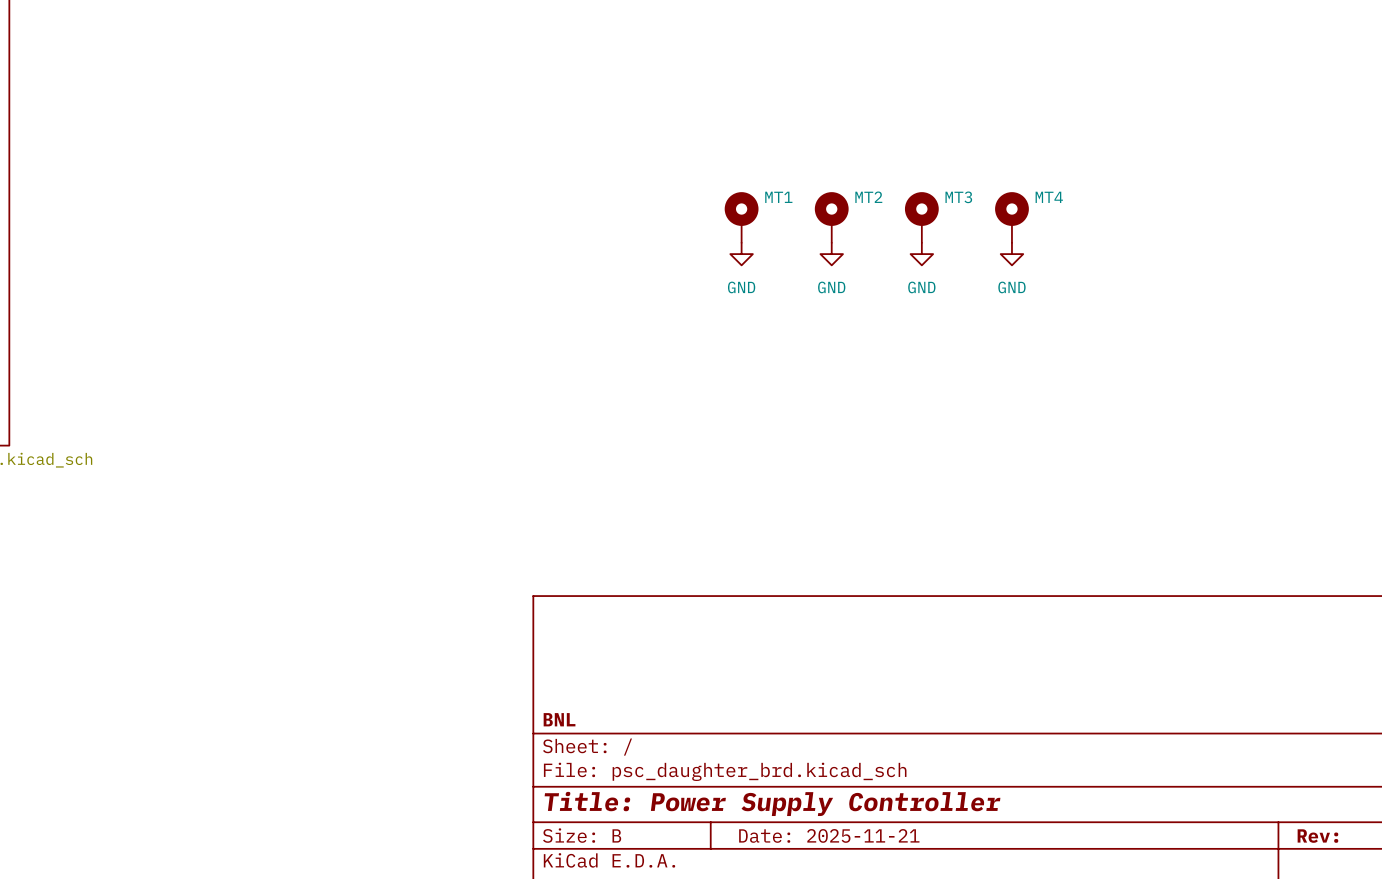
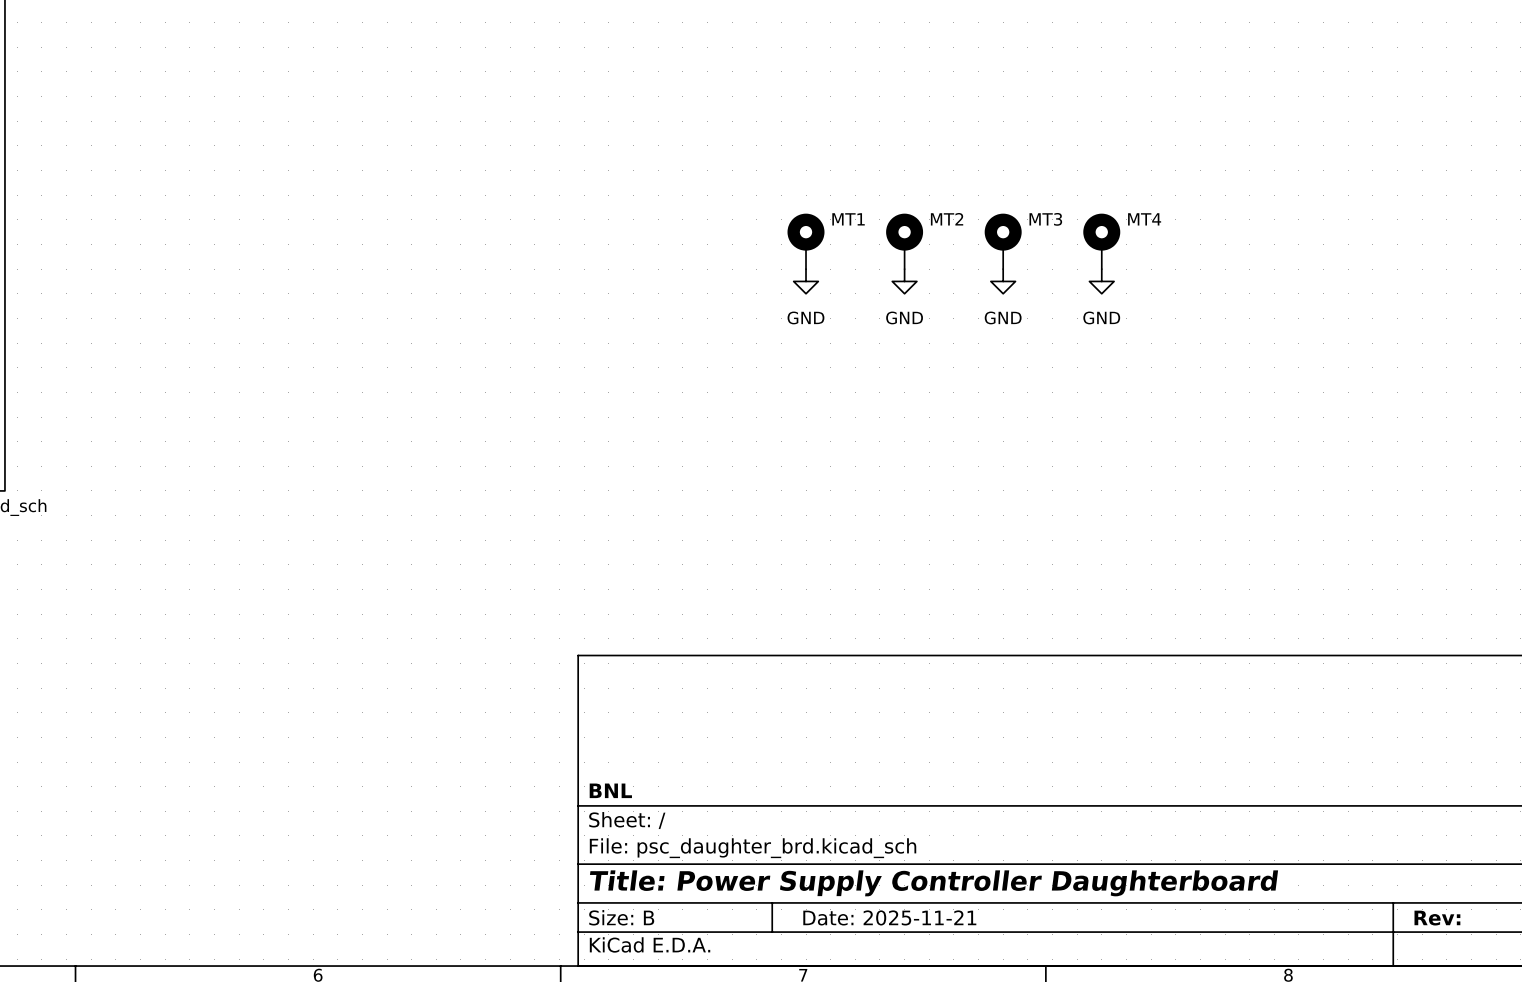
title block: Title: Power Supply Controller (772, 803) -> Title: Power Supply Controller Daughterboard (934, 883)

